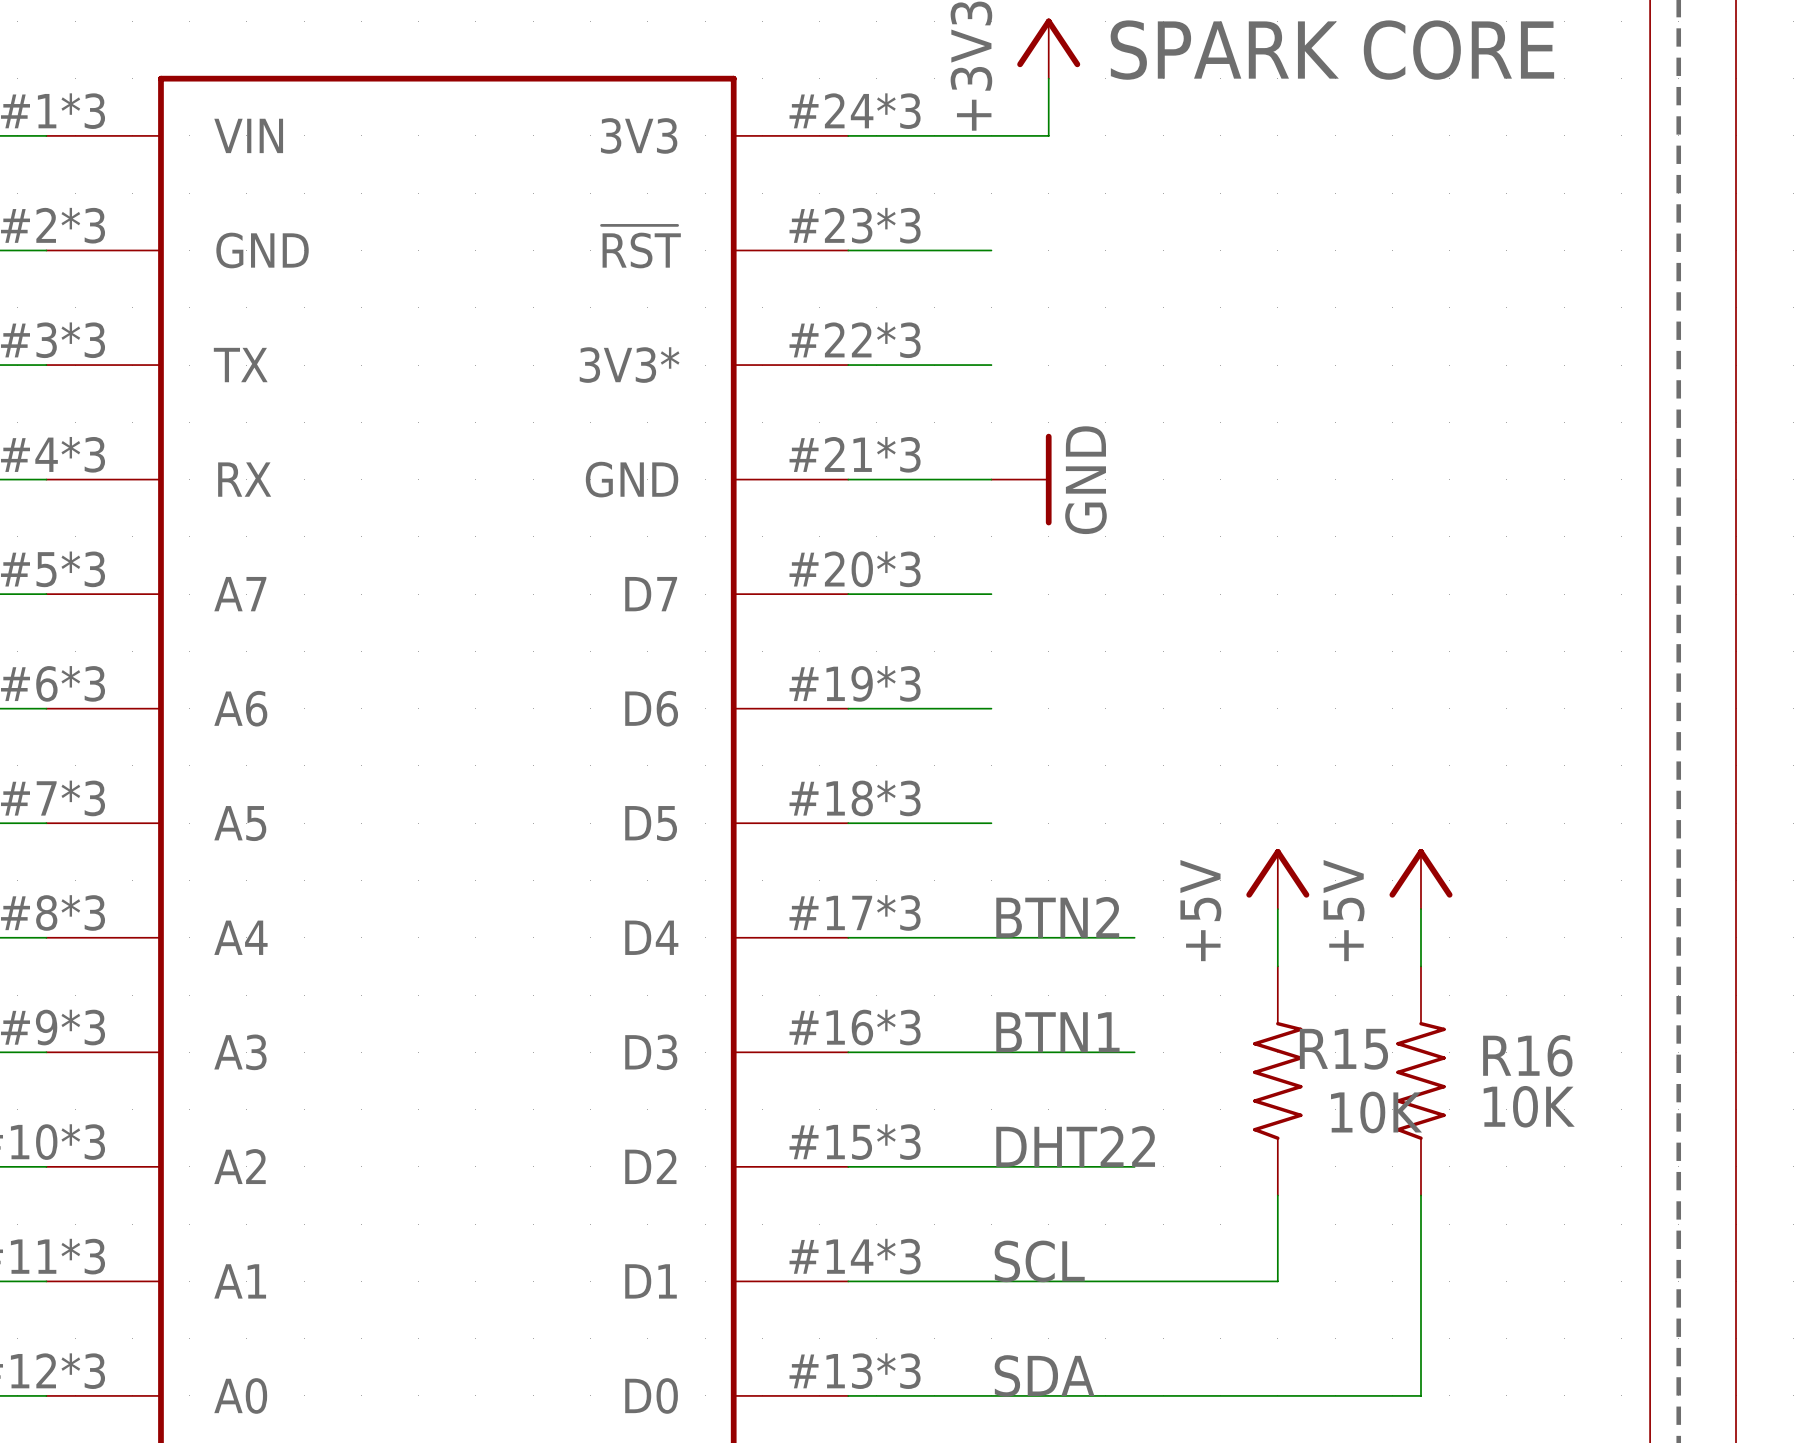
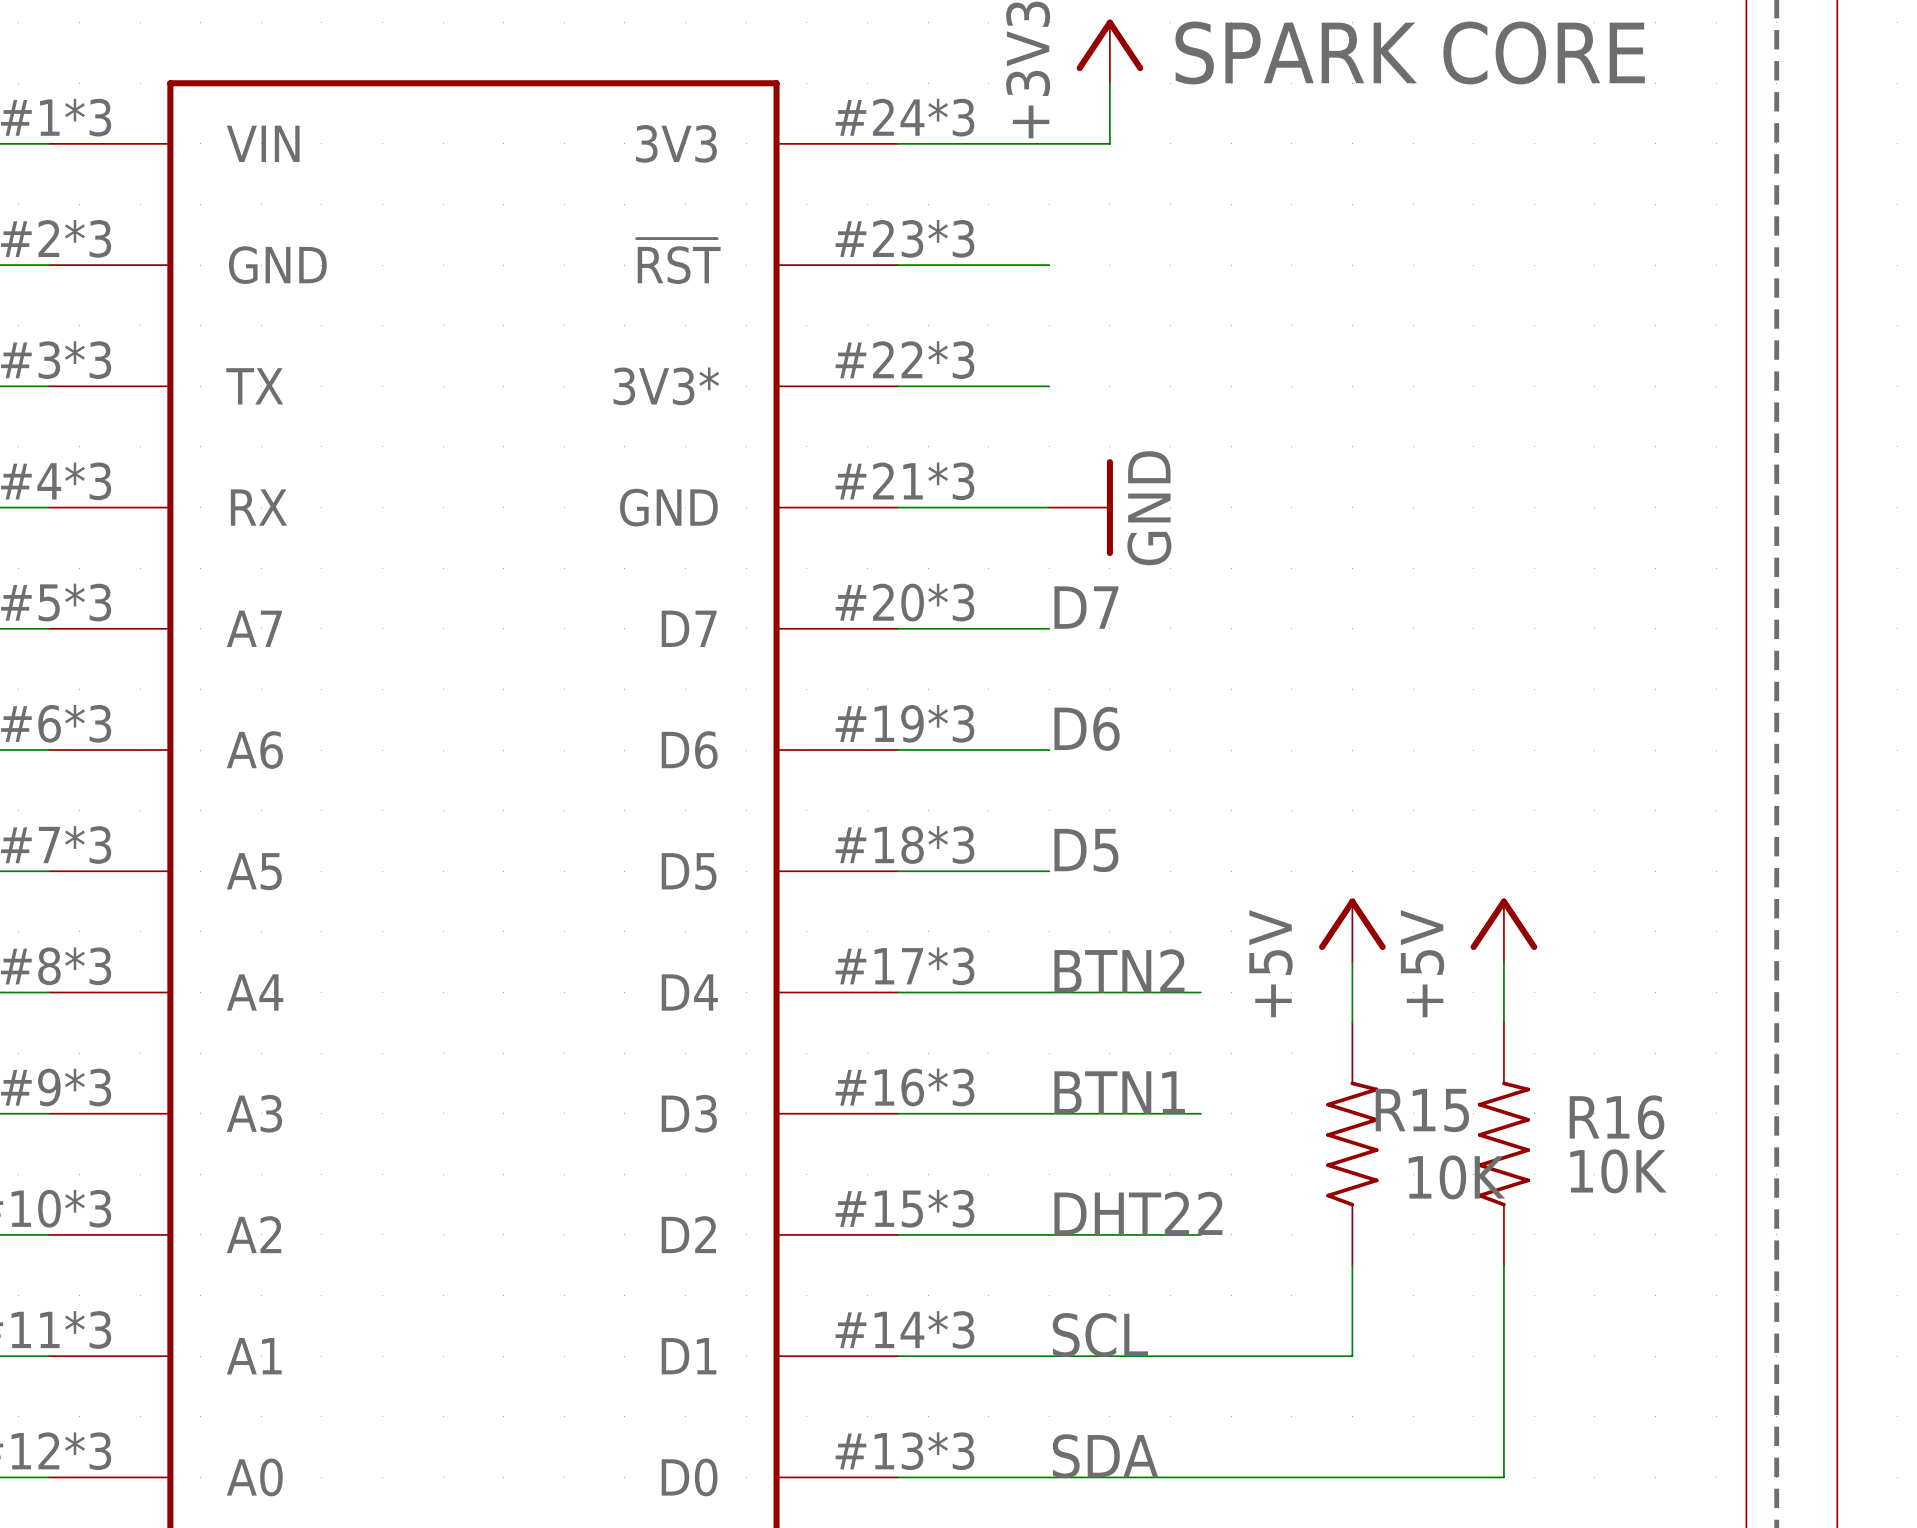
label: none -> D7 (1086, 607)
label: none -> D6 (1087, 728)
label: none -> D5 (1086, 850)

